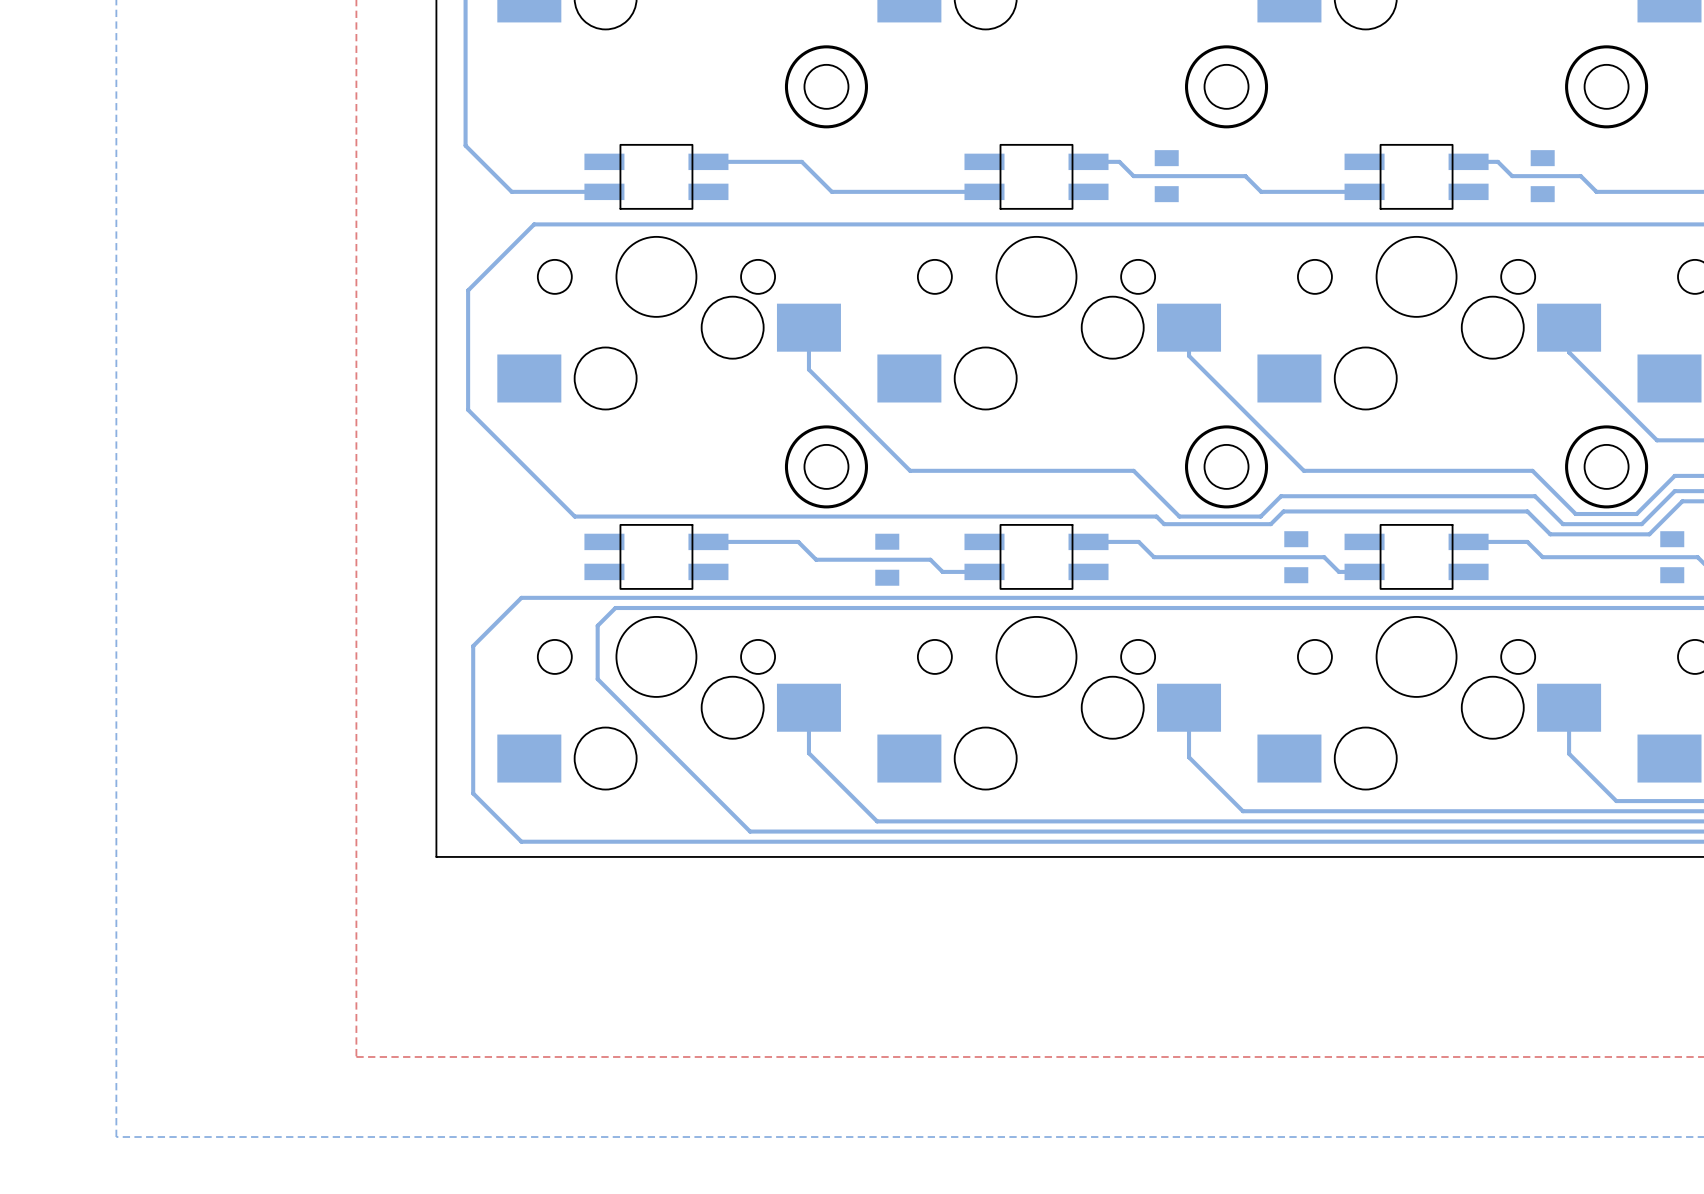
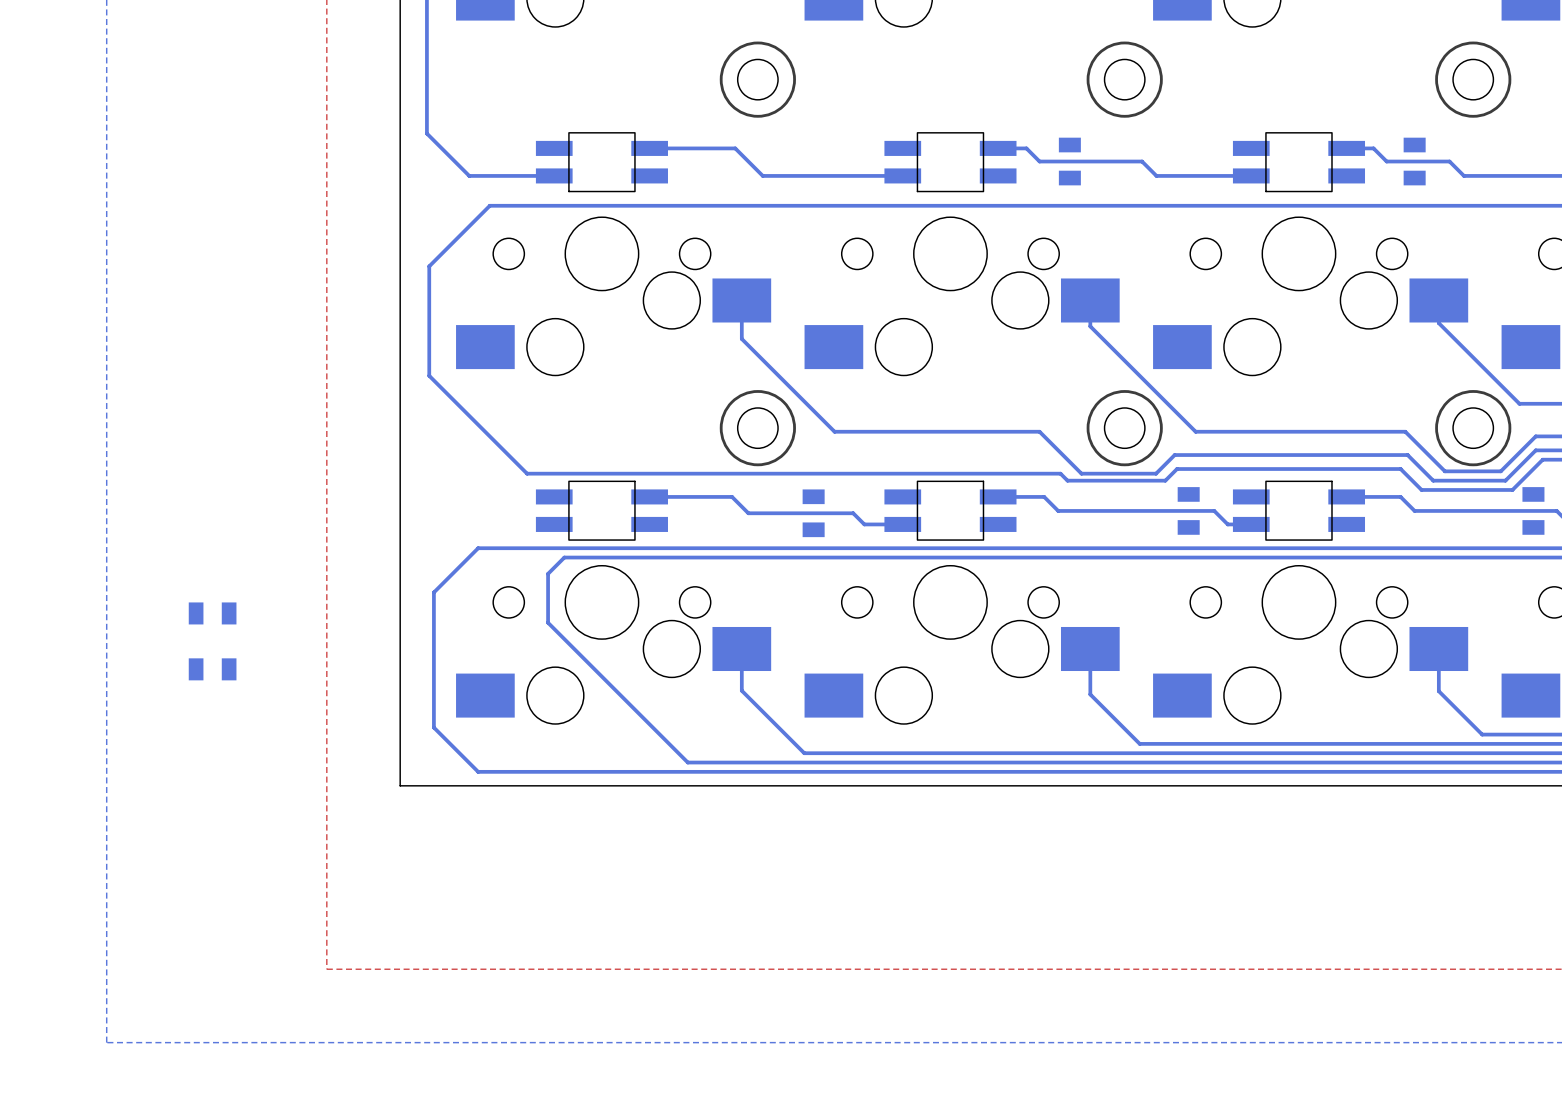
part: none -> (212, 613)
part: none -> (212, 669)

